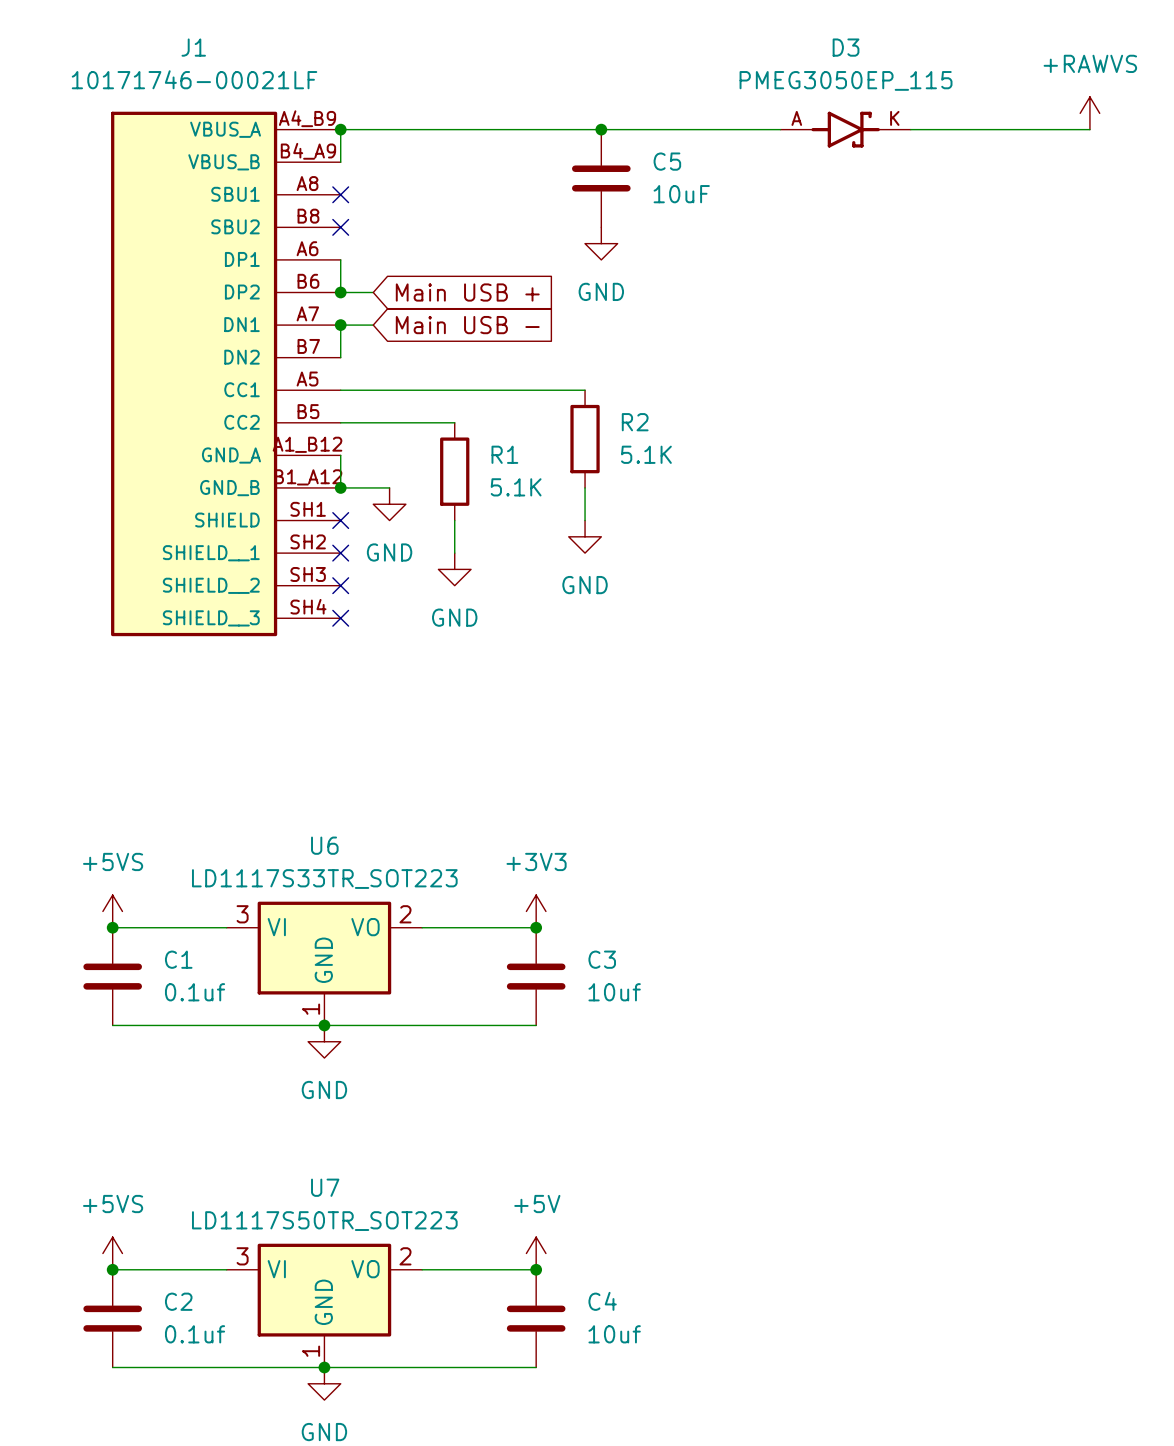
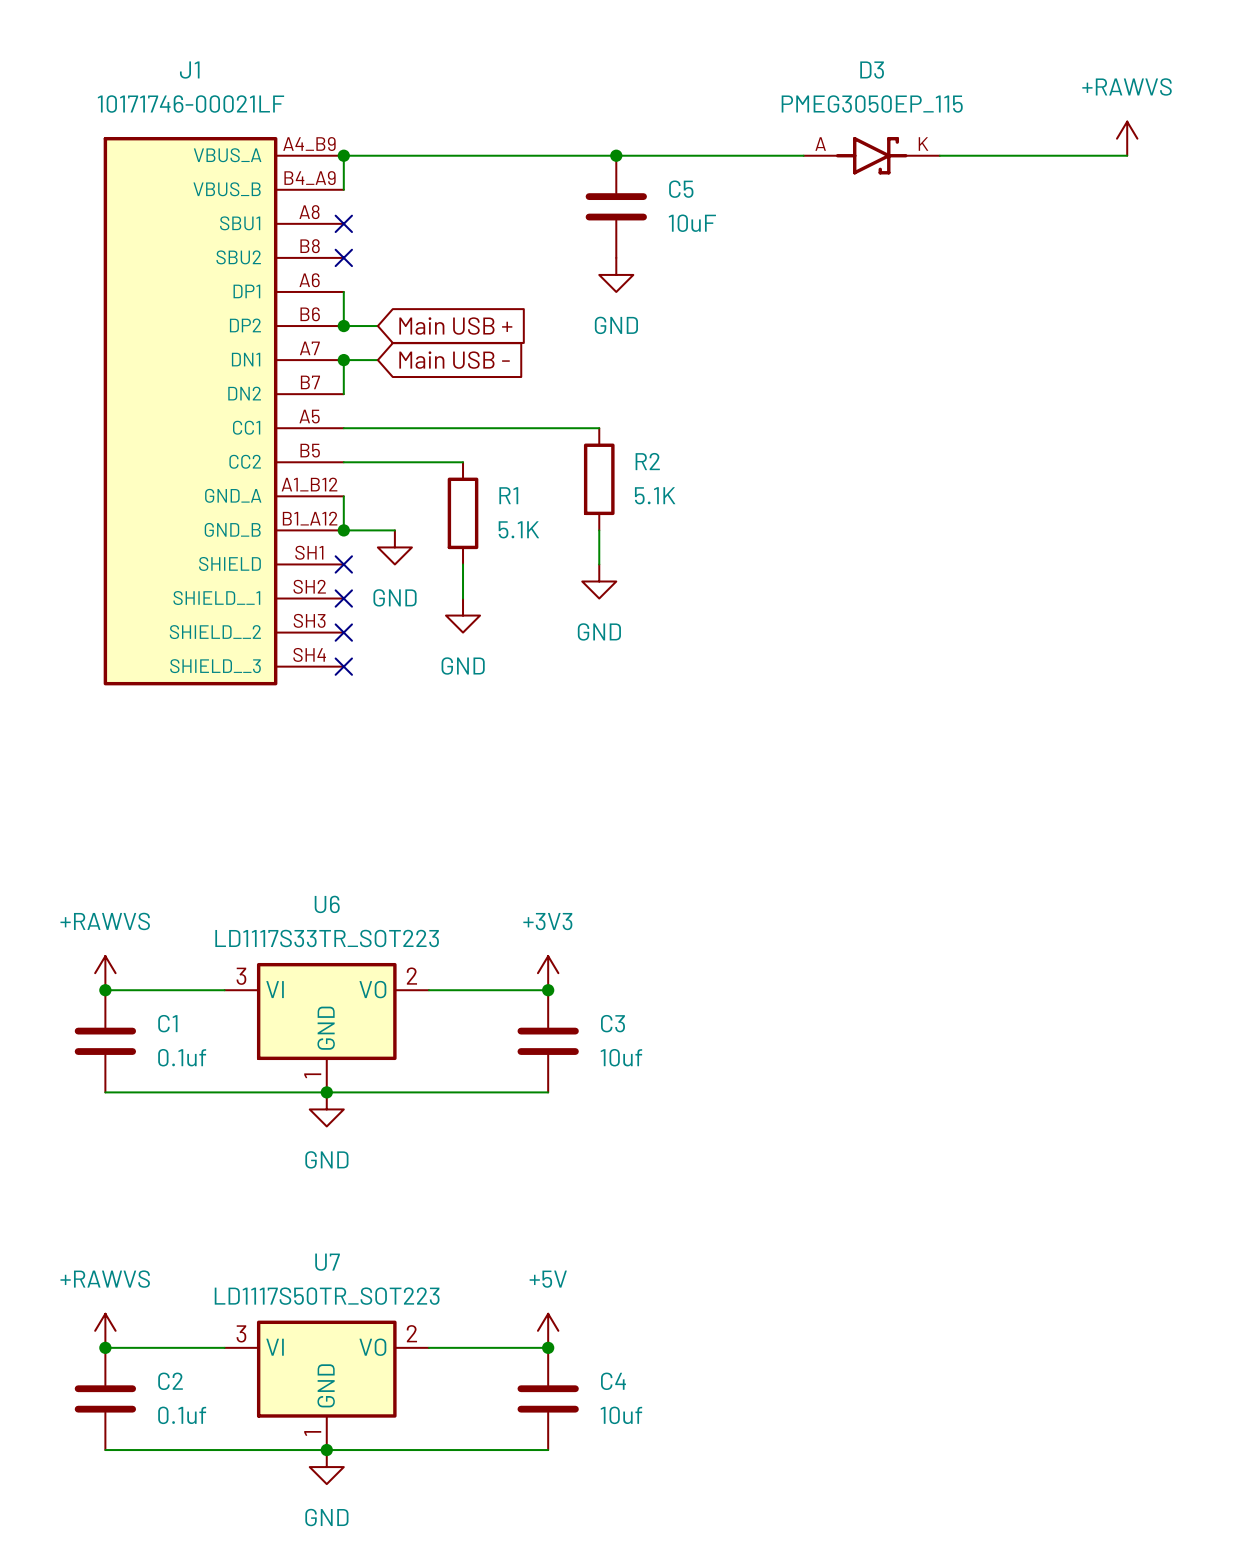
power symbol: +5VS (112, 911) -> +RAWVS (105, 973)
power symbol: +5VS (112, 1253) -> +RAWVS (105, 1330)

